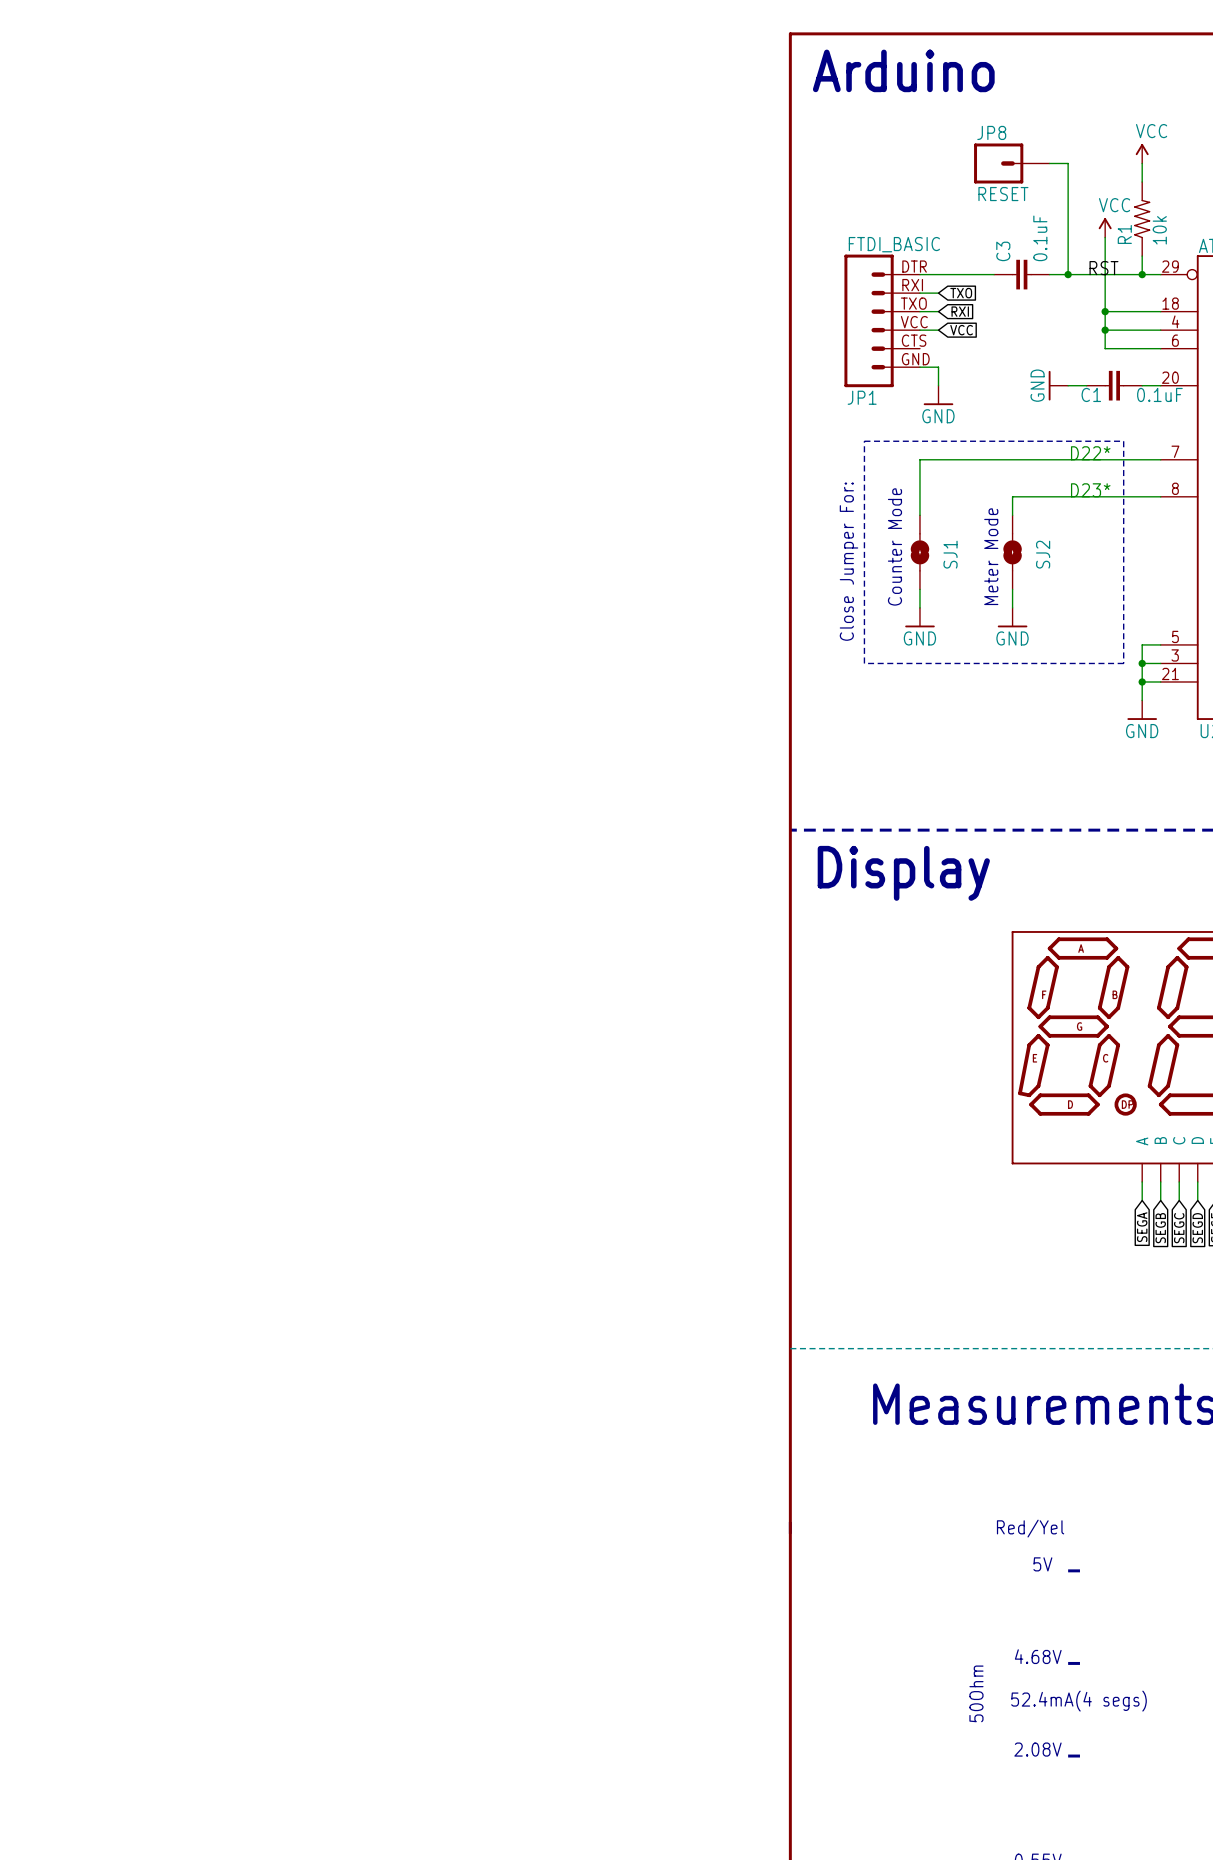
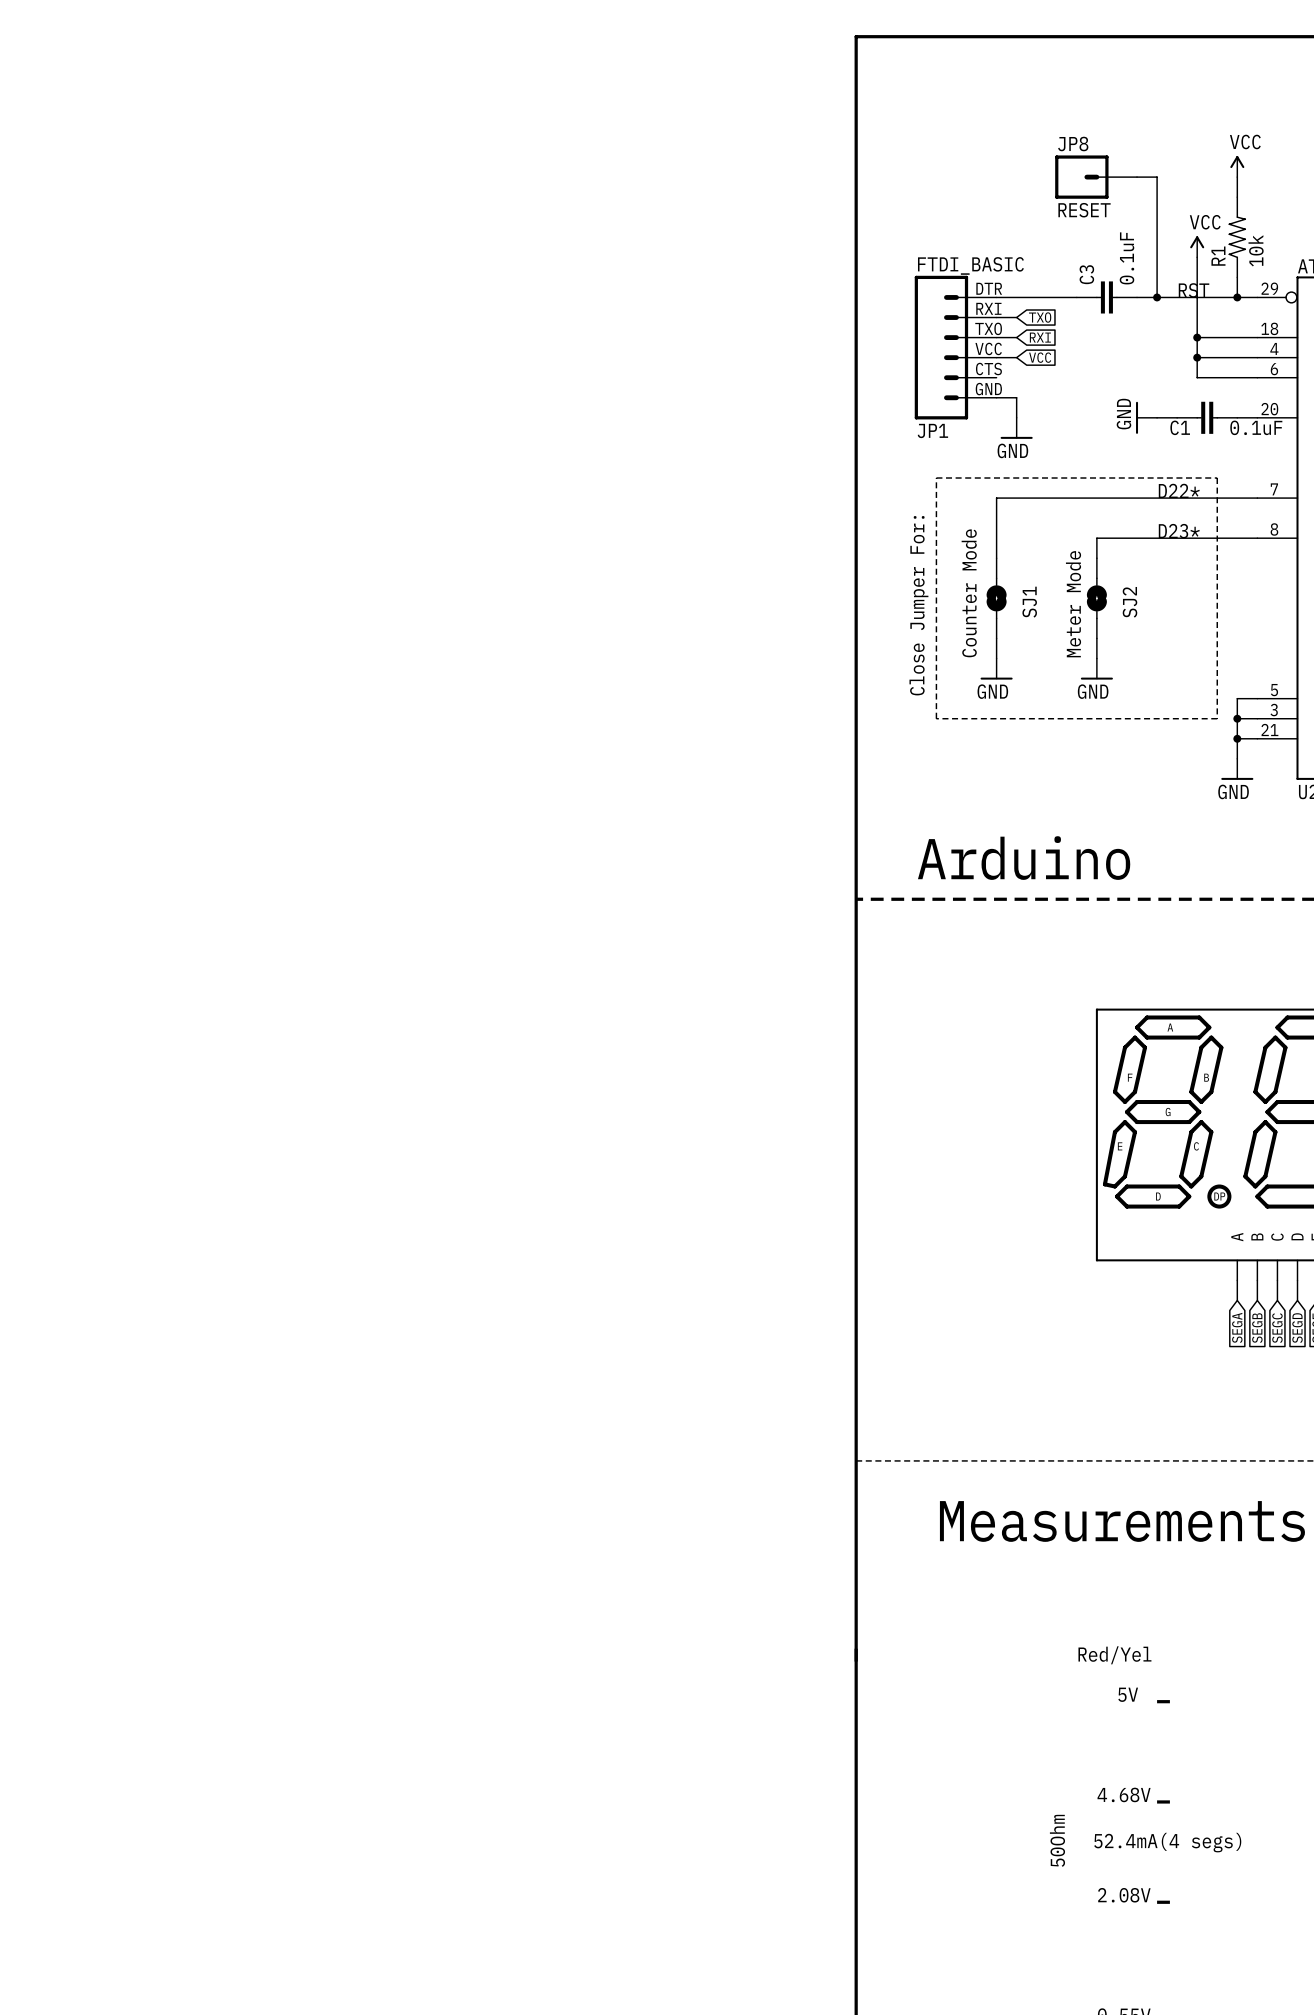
text: Arduino (903, 70) -> none
text: none -> Arduino (1024, 858)
text: Display (903, 873) -> none

